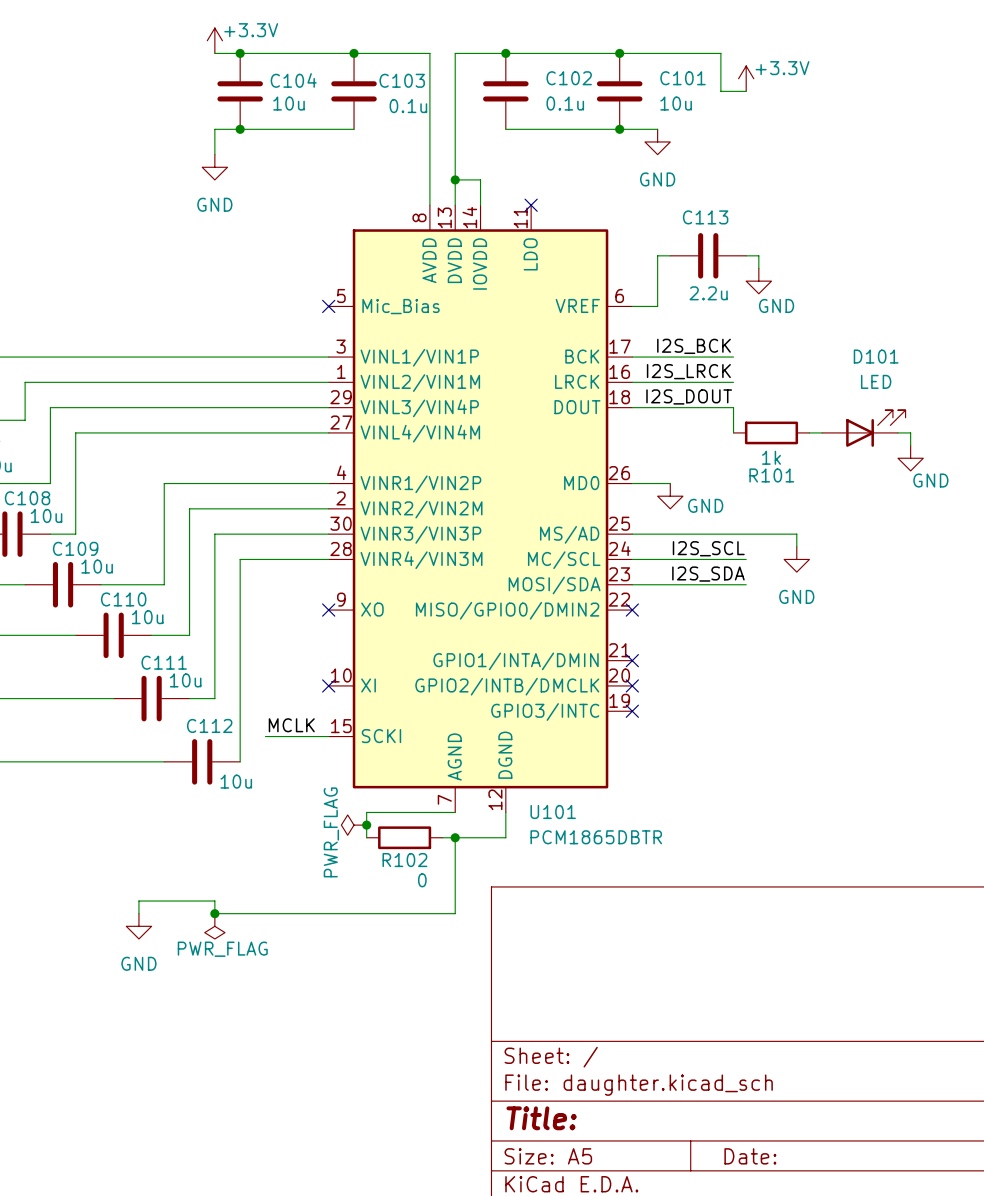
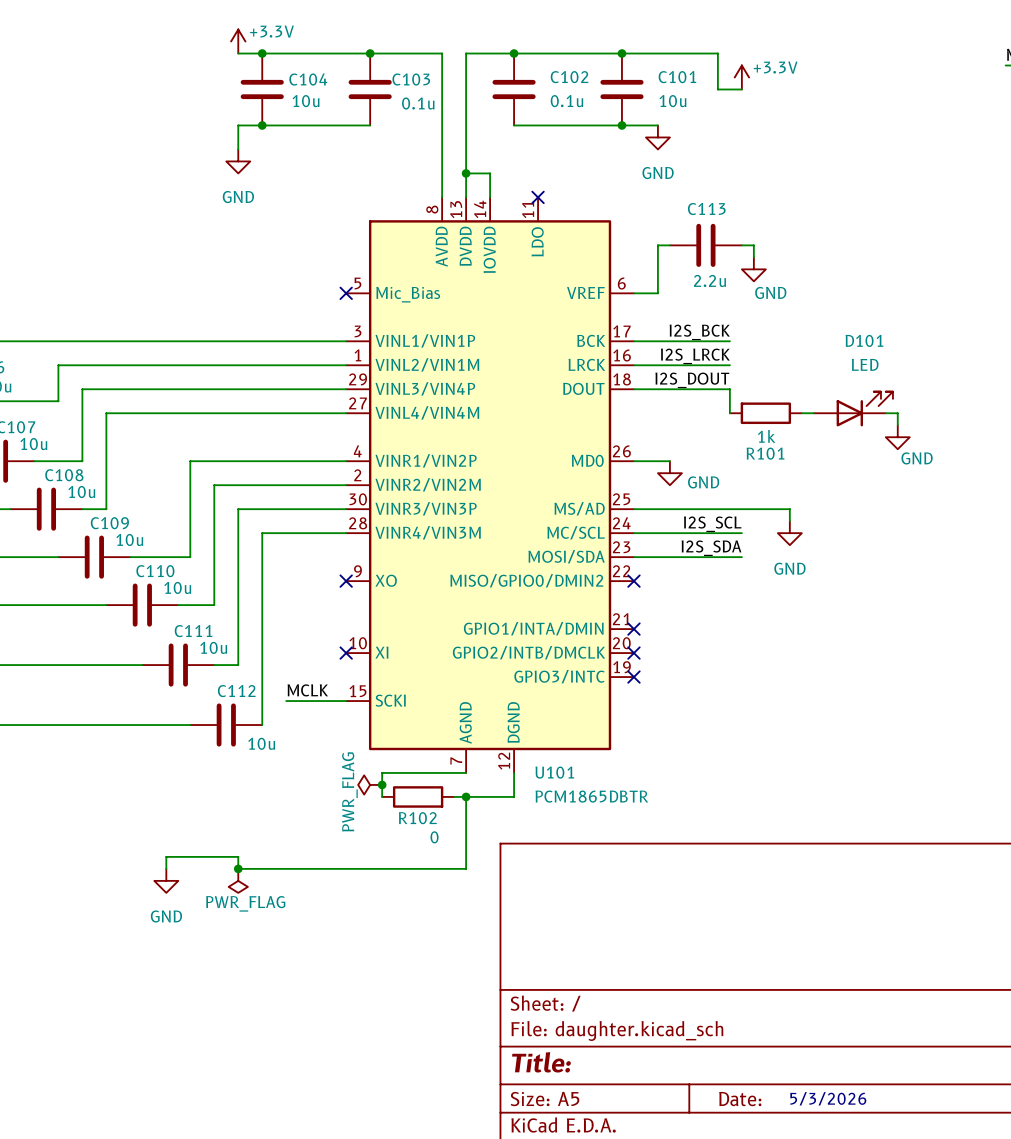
text: none -> 5/3/2026 (828, 1098)

